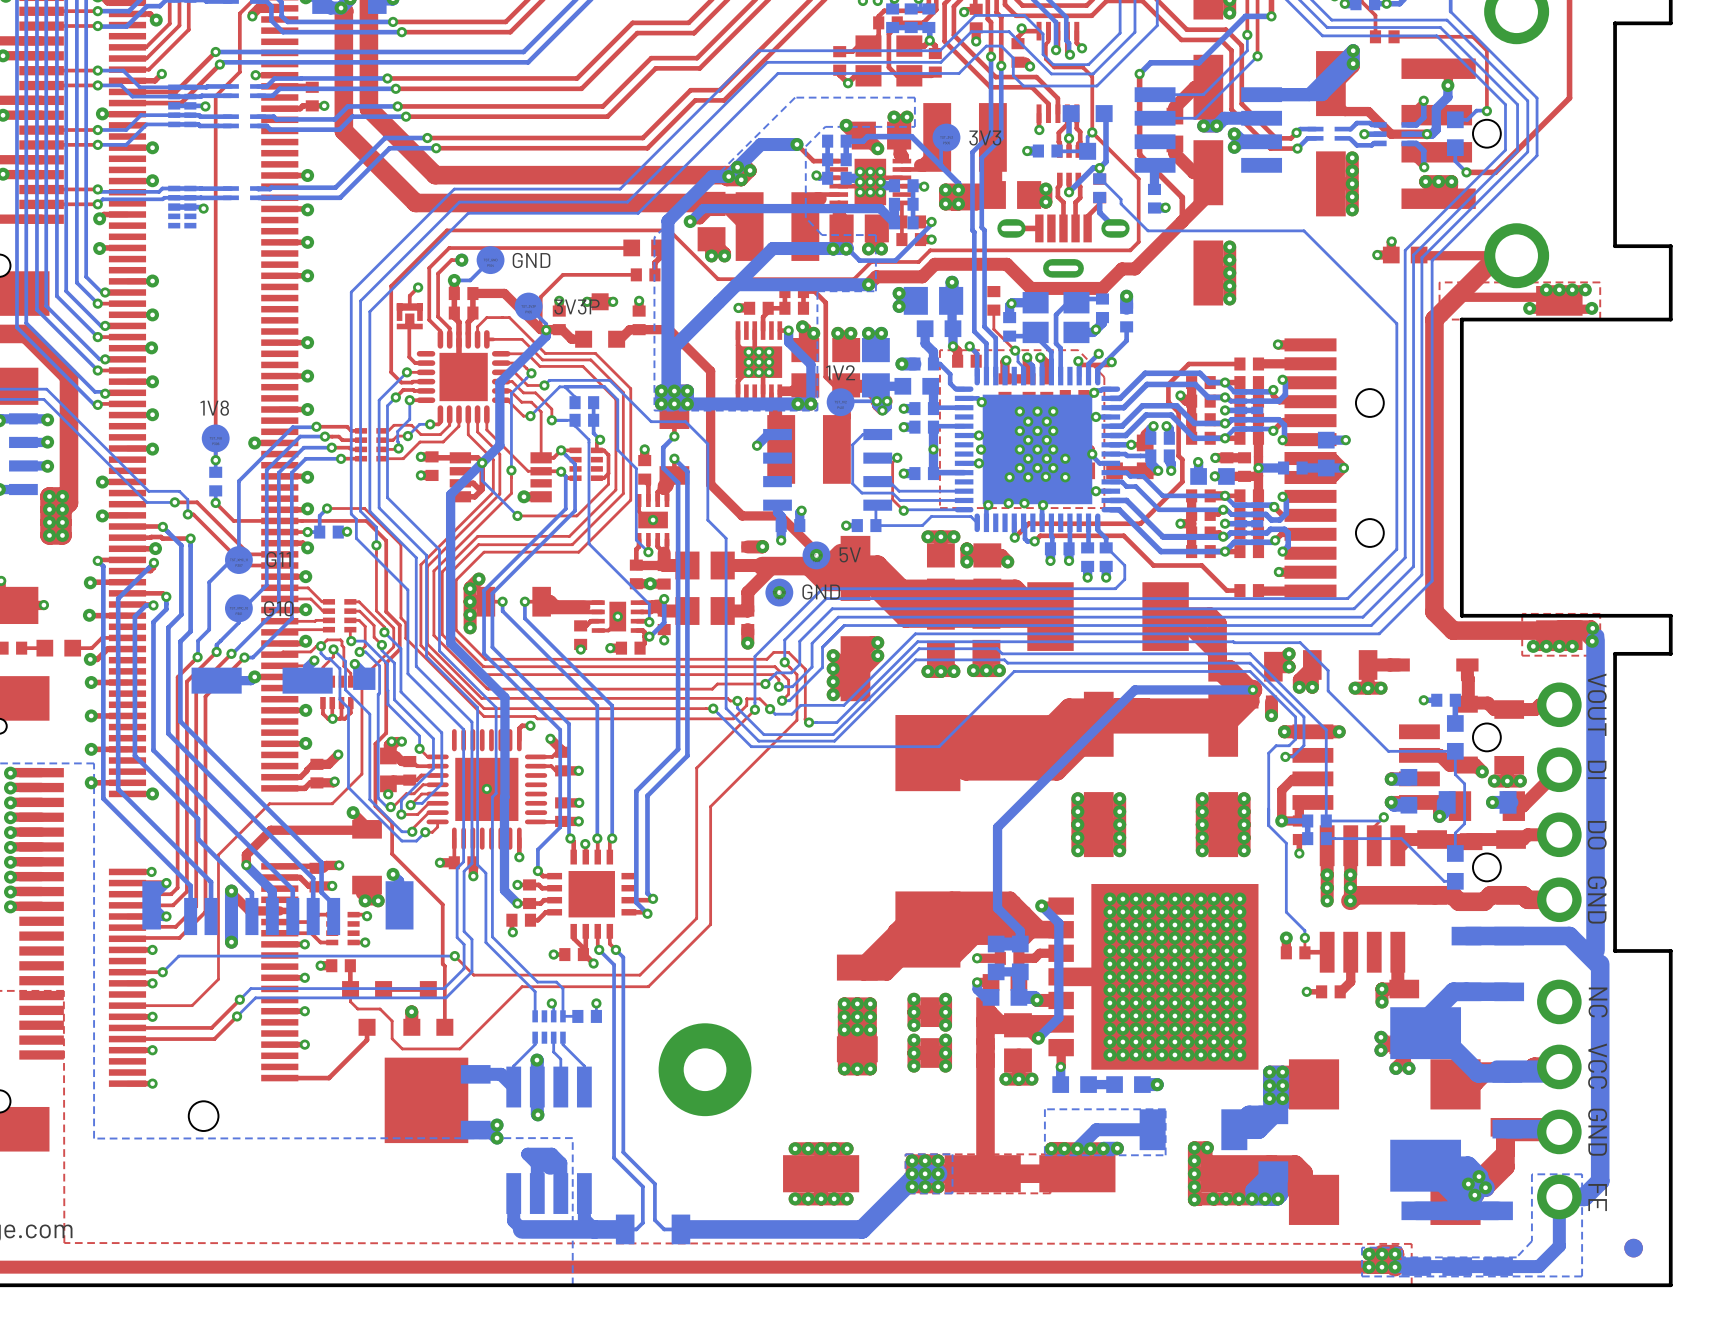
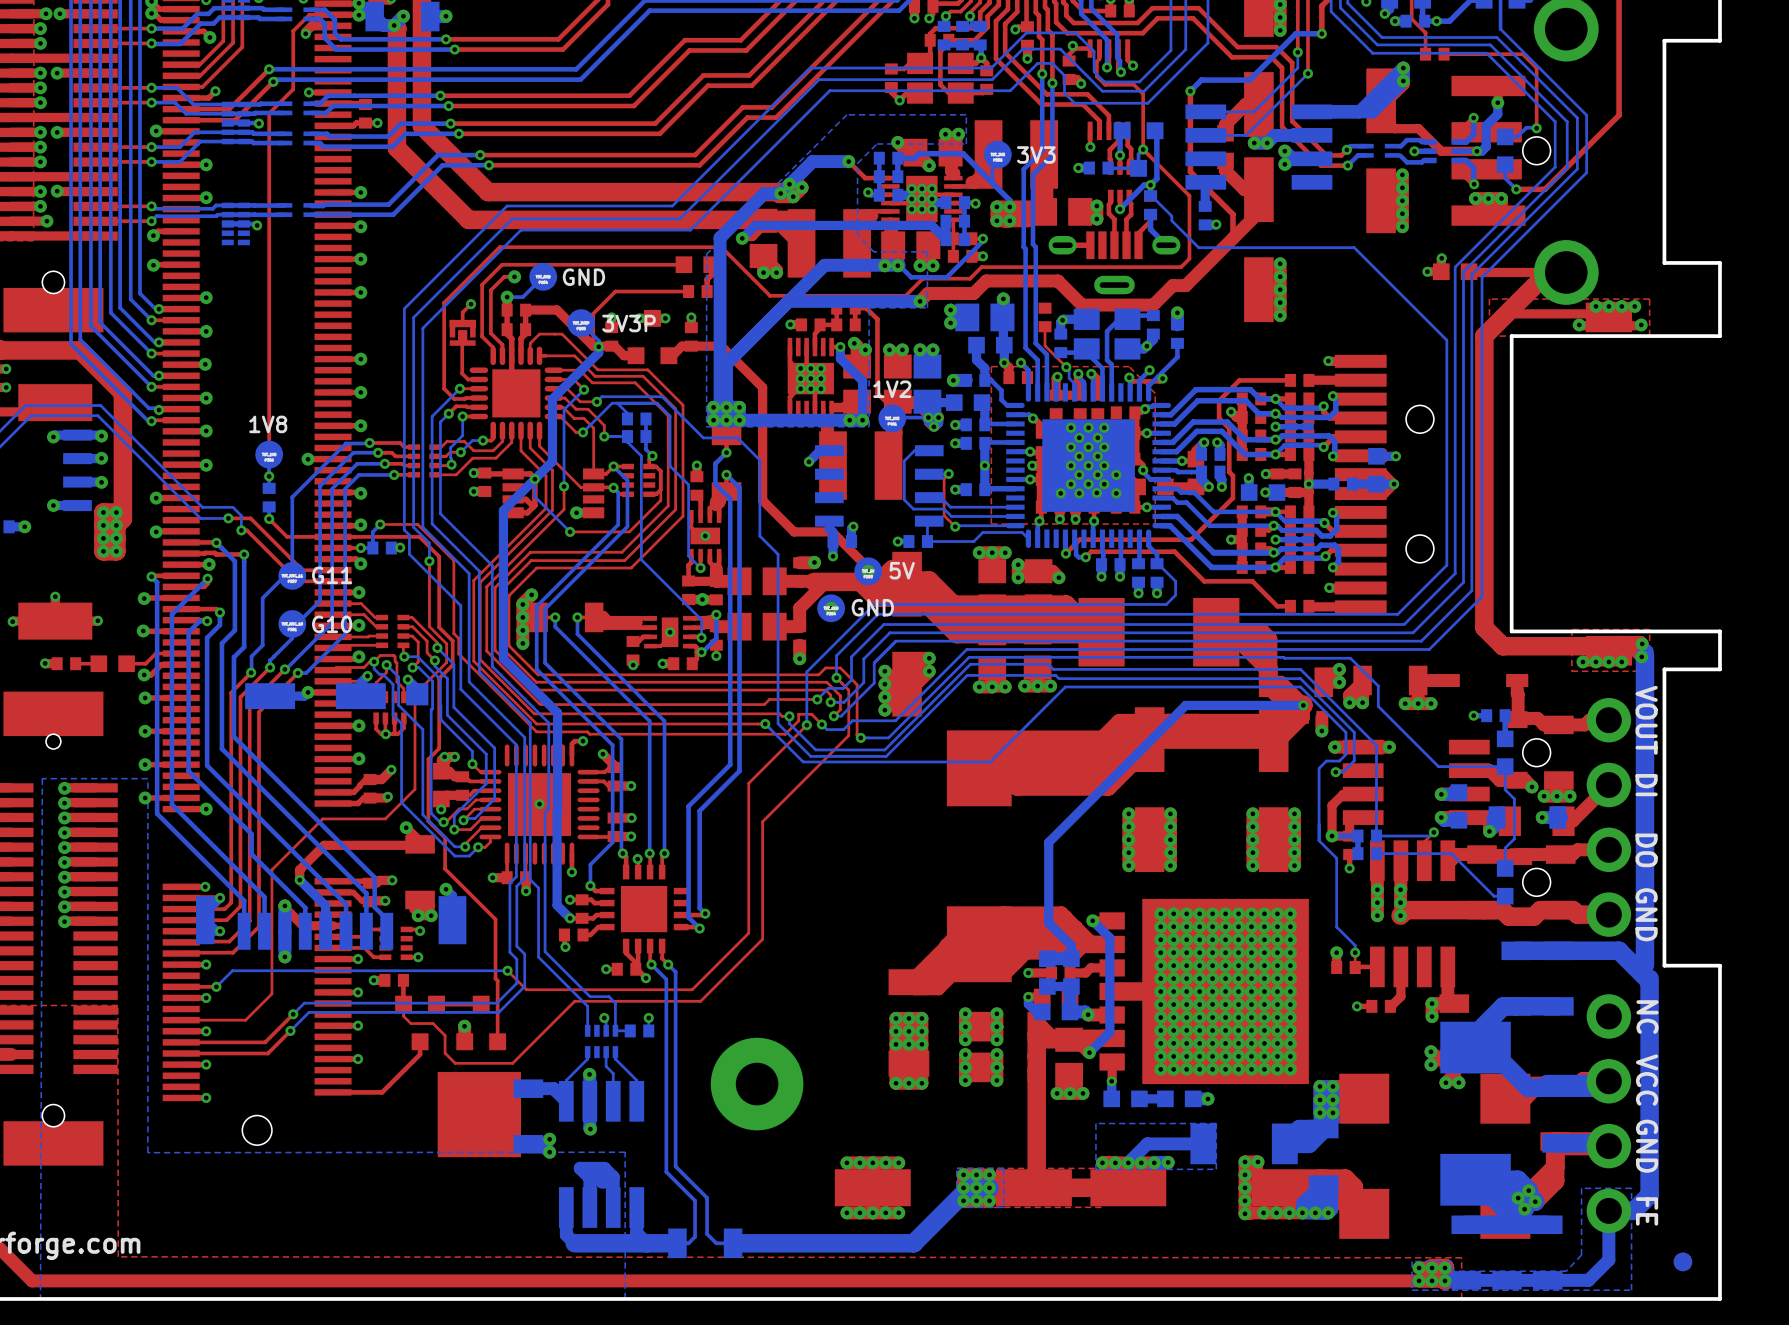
part footprint: [954, 366, 1121, 533] -> [1006, 383, 1171, 548]

